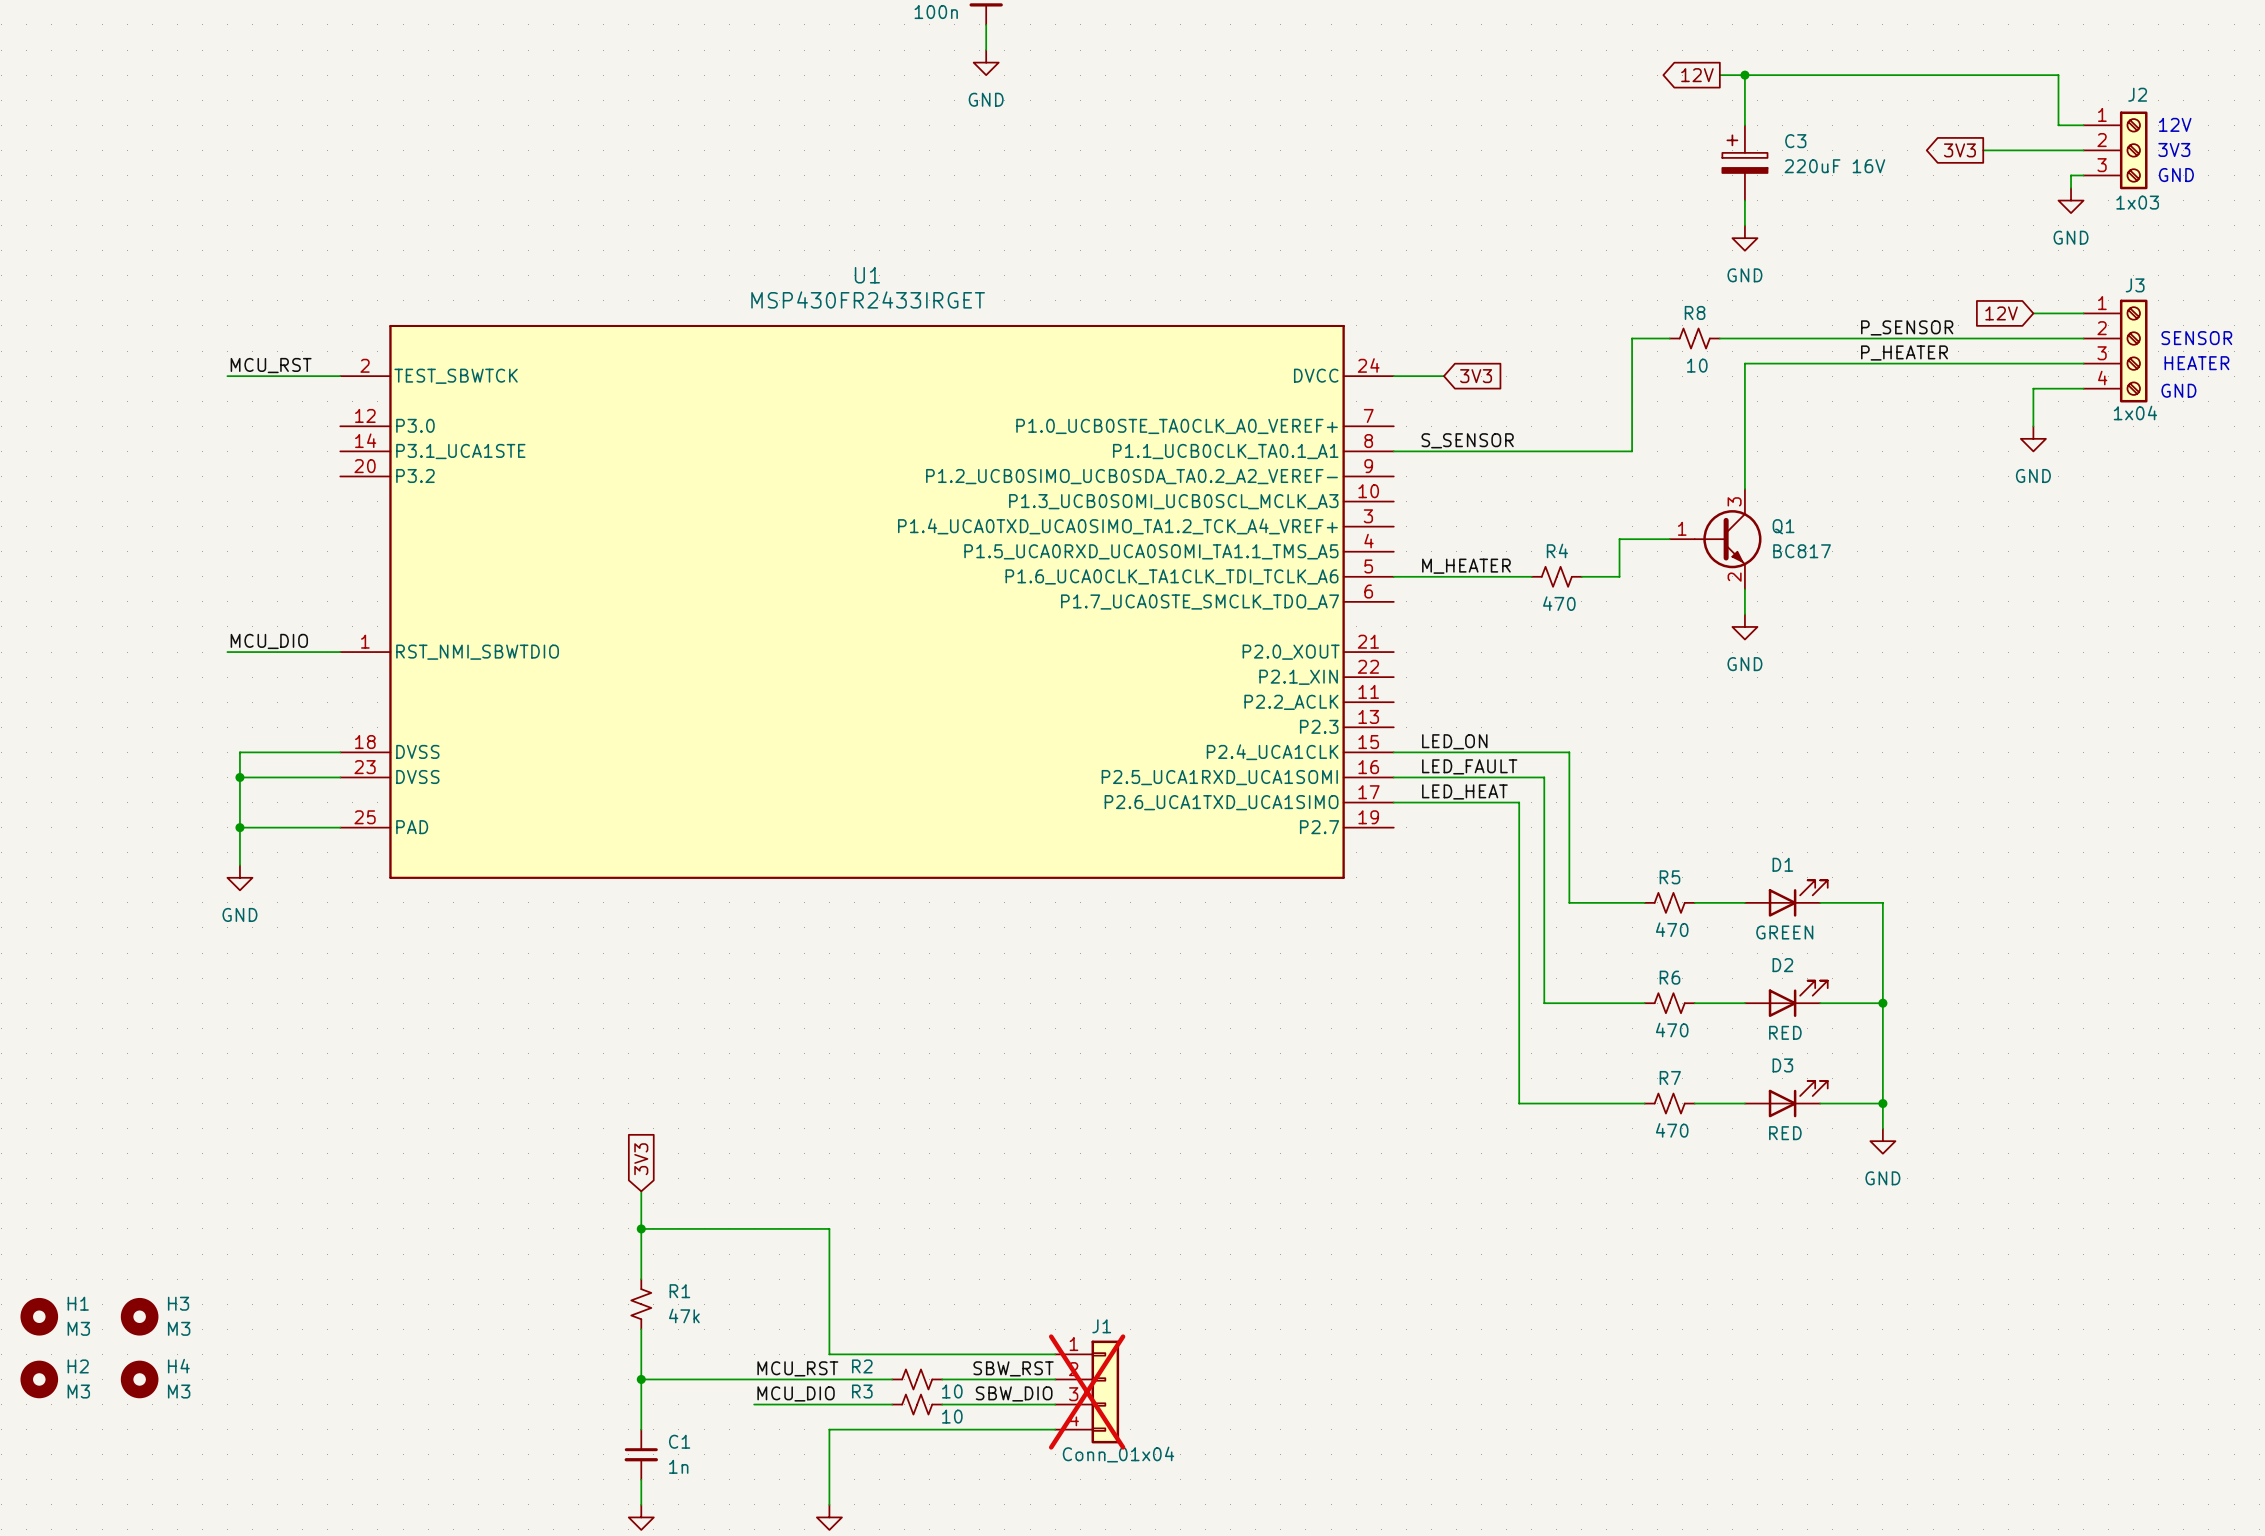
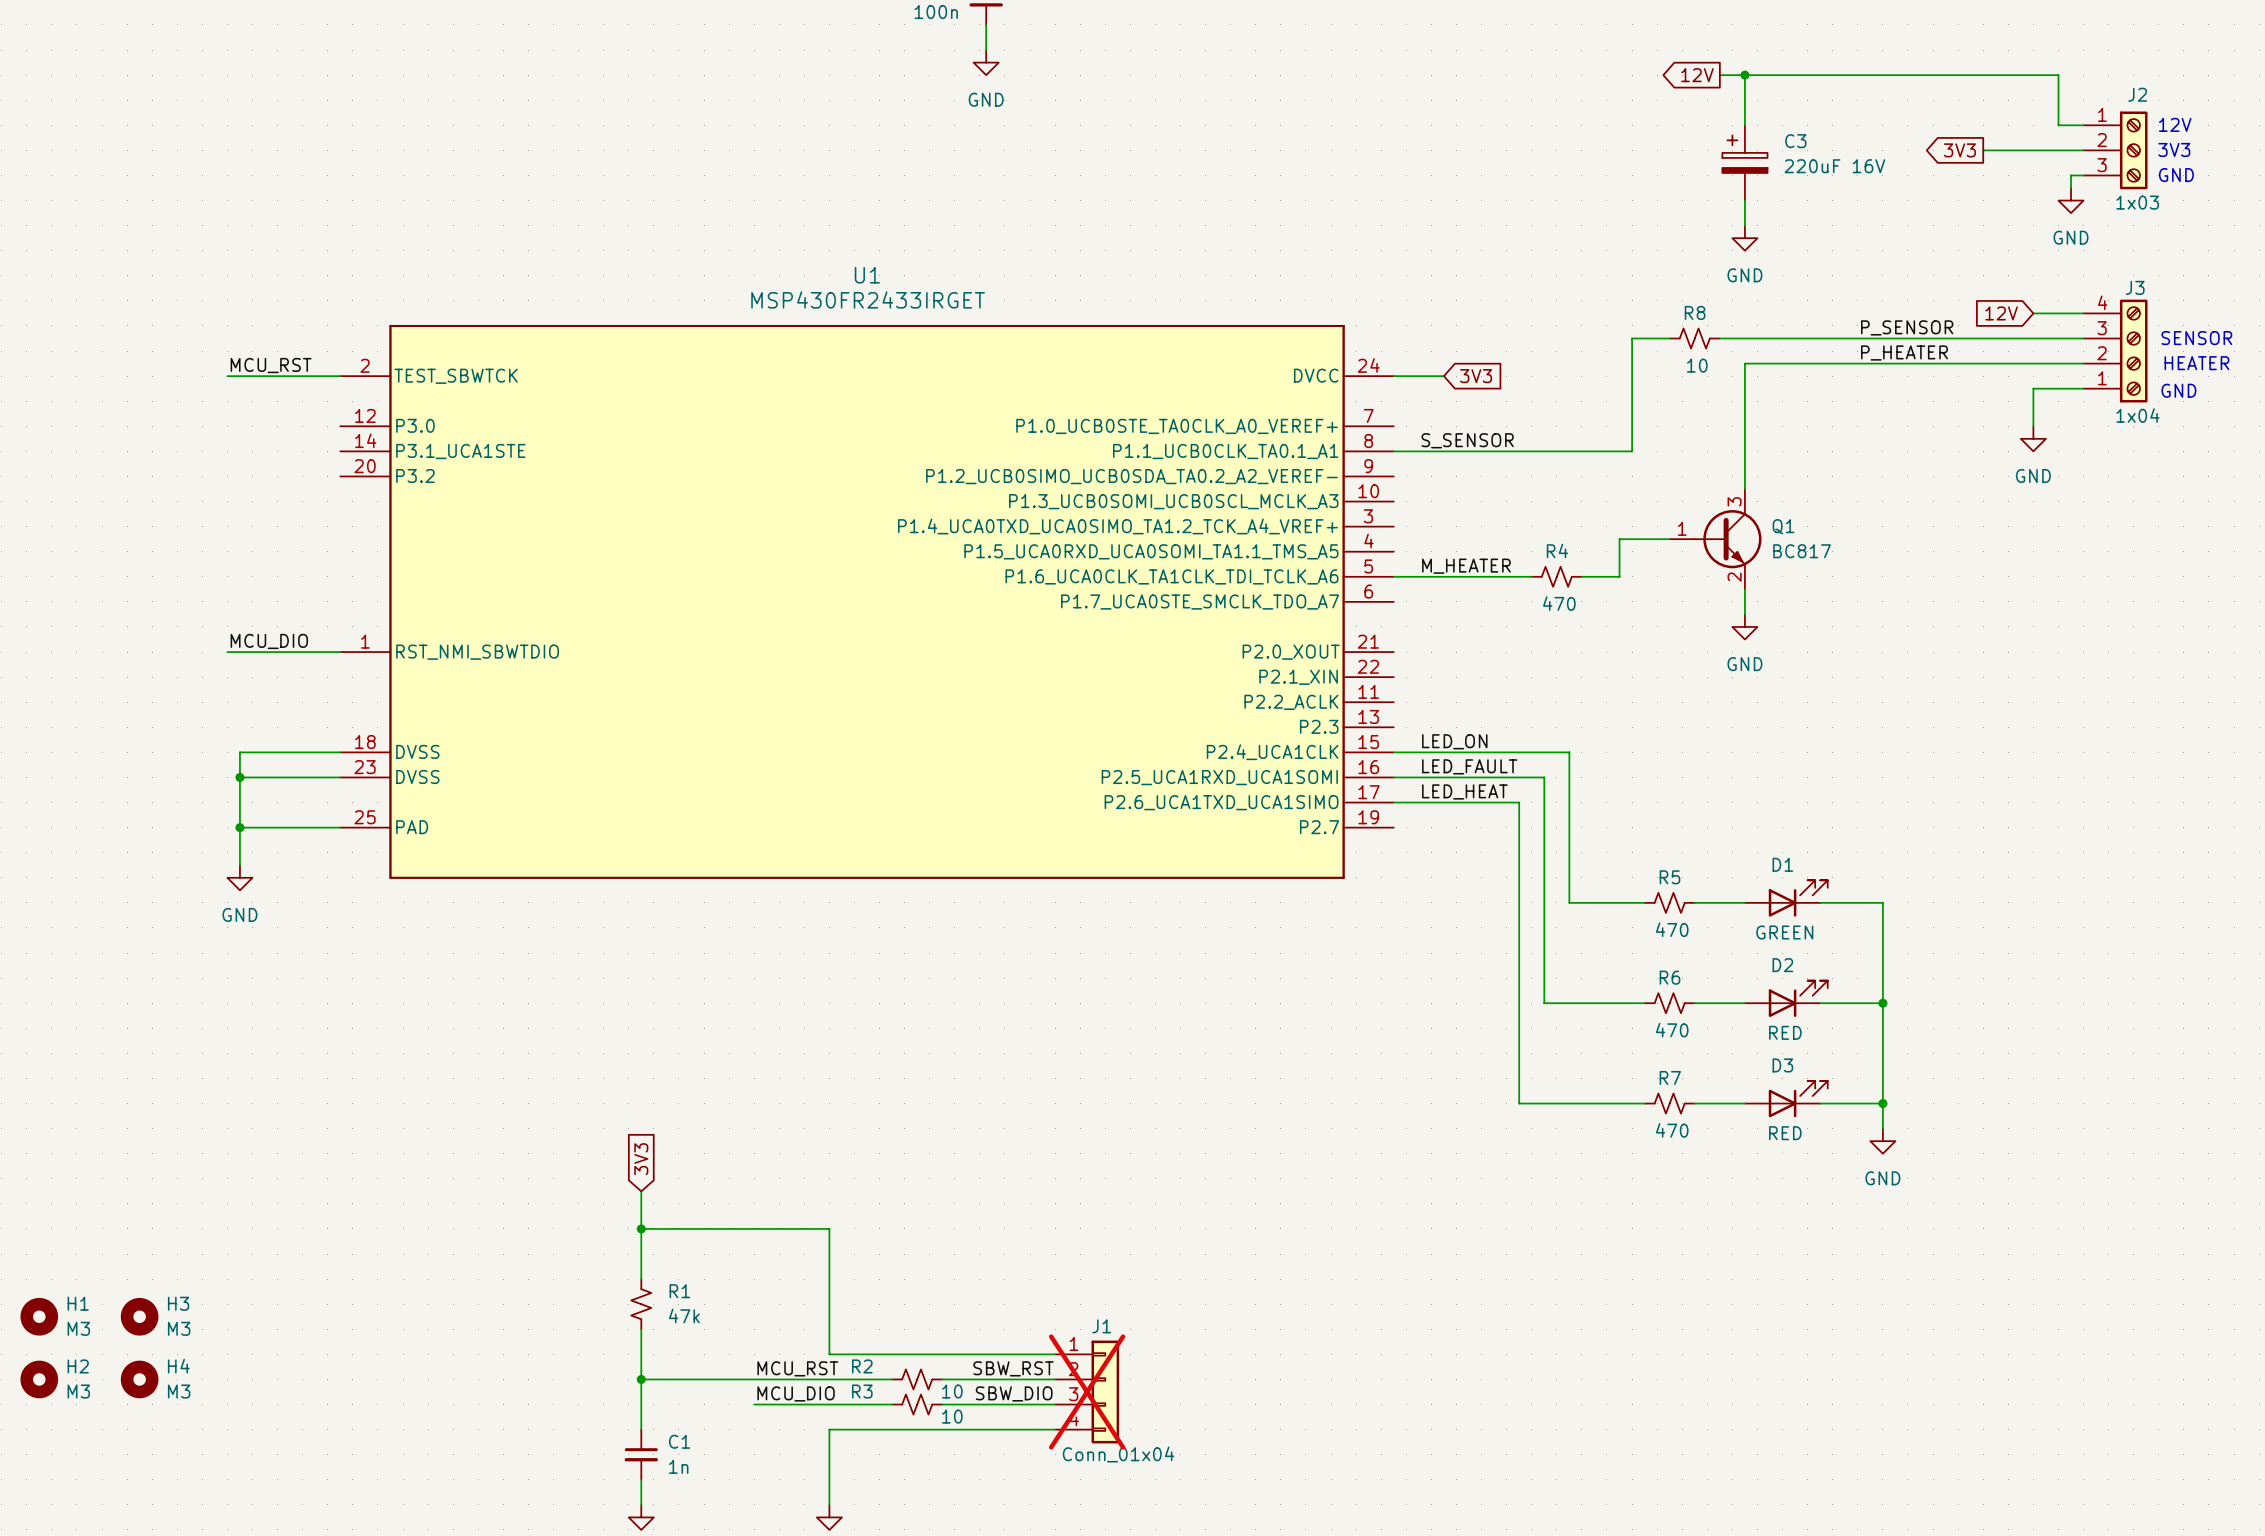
J3 flip: as is (2133, 351) -> up-down (2133, 351)

